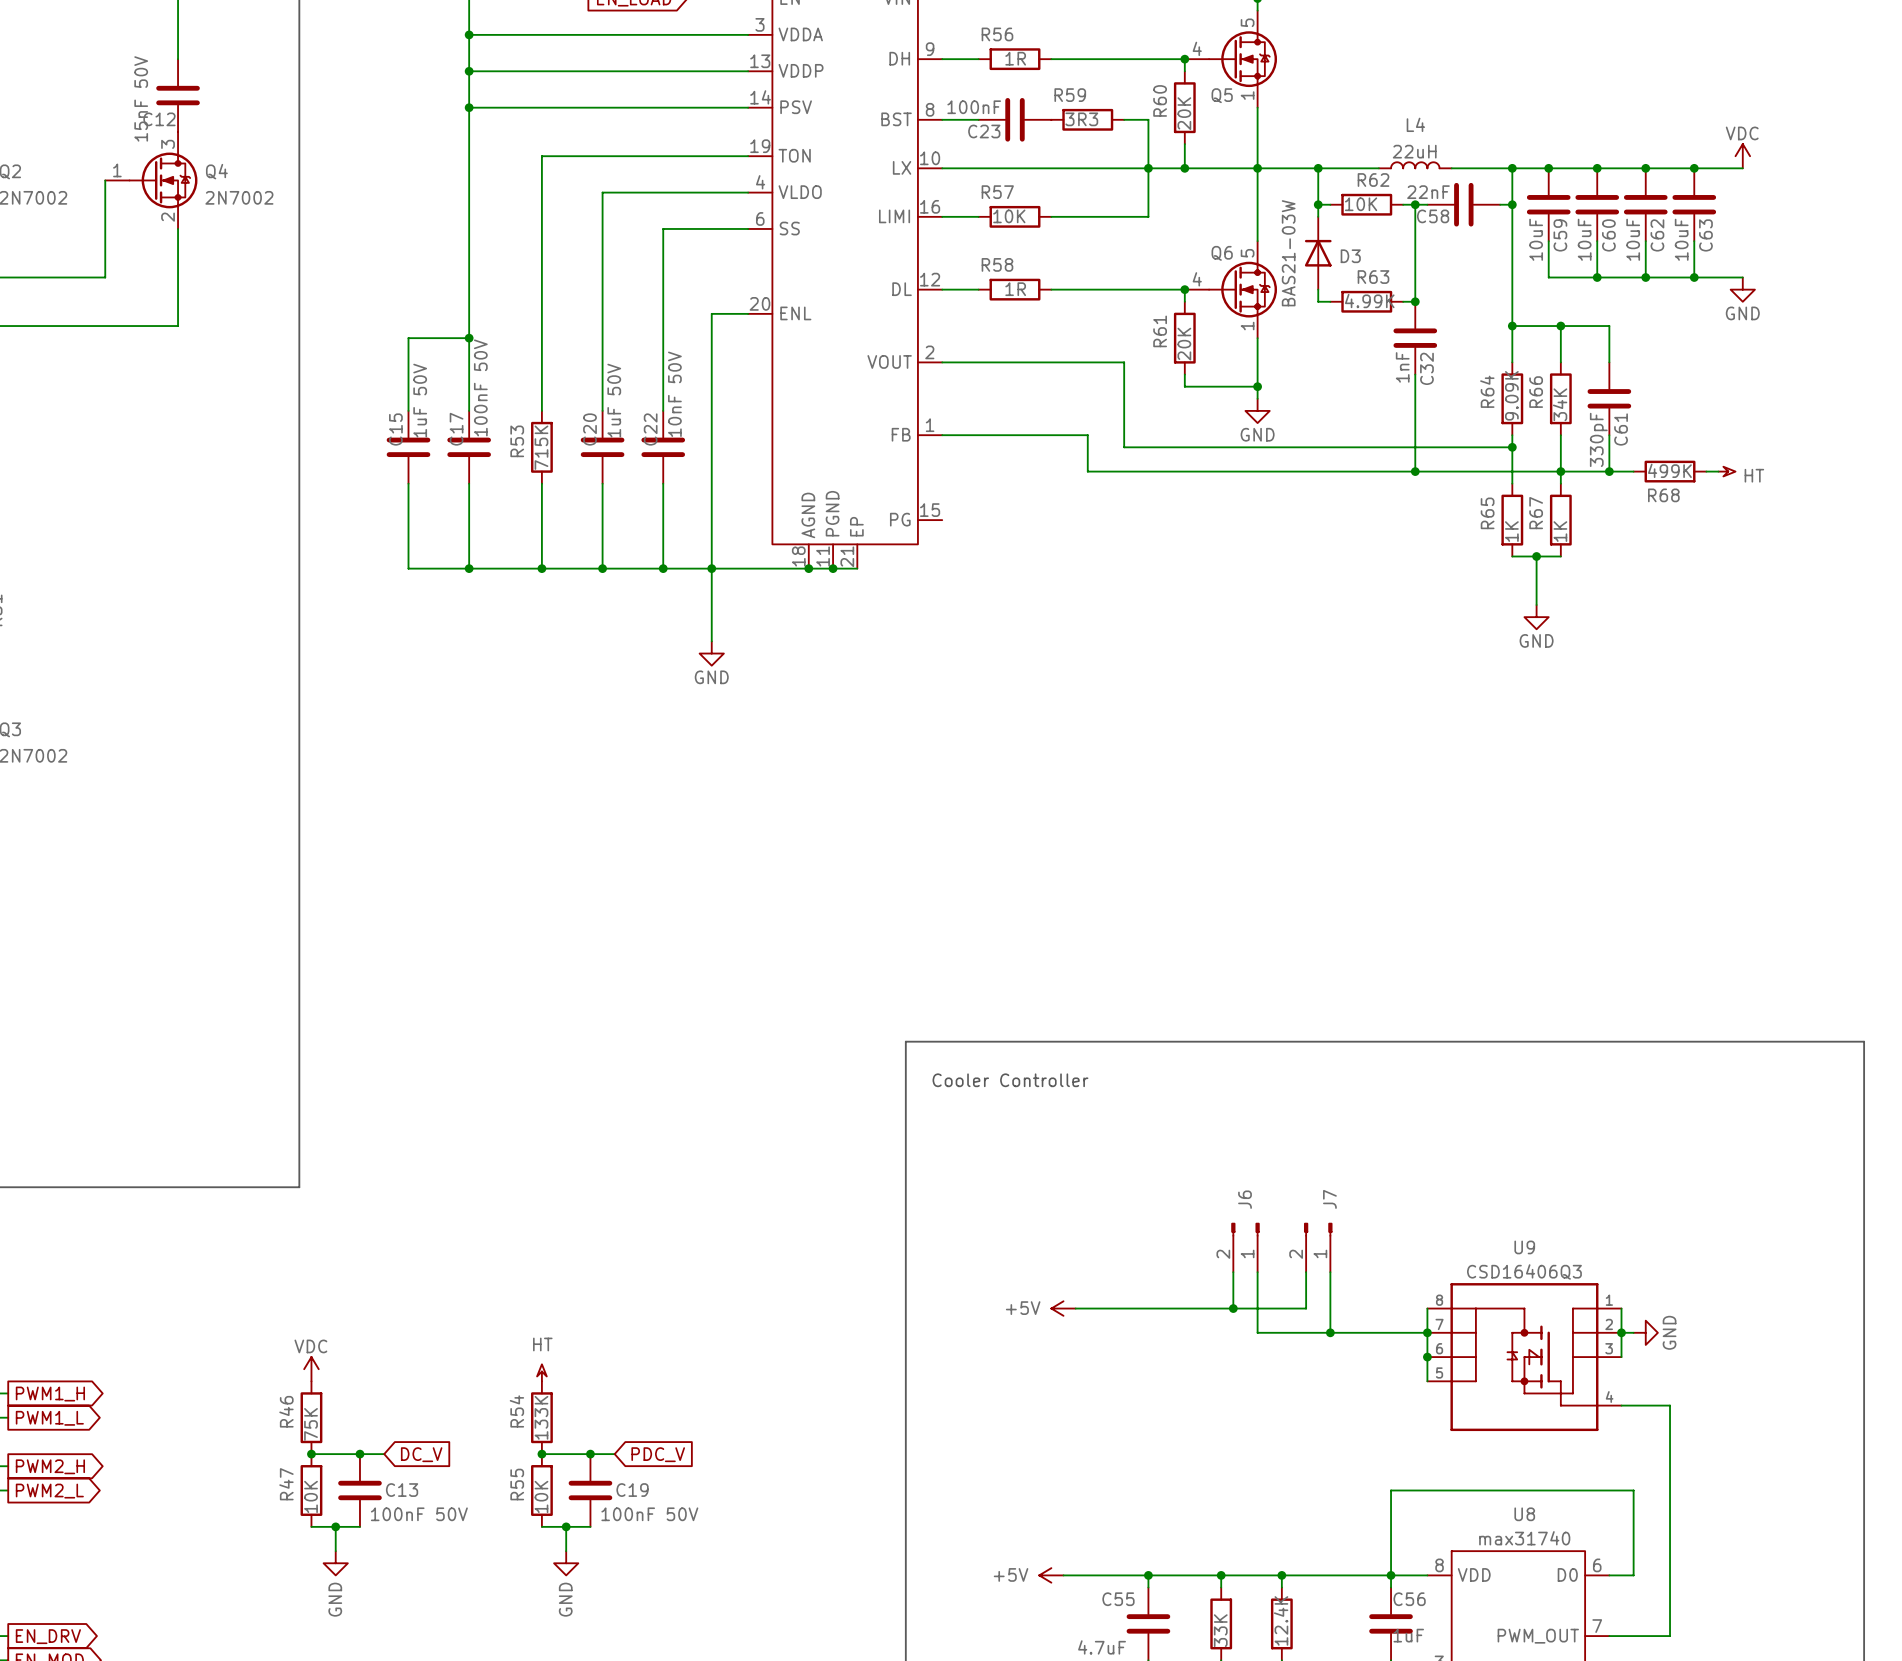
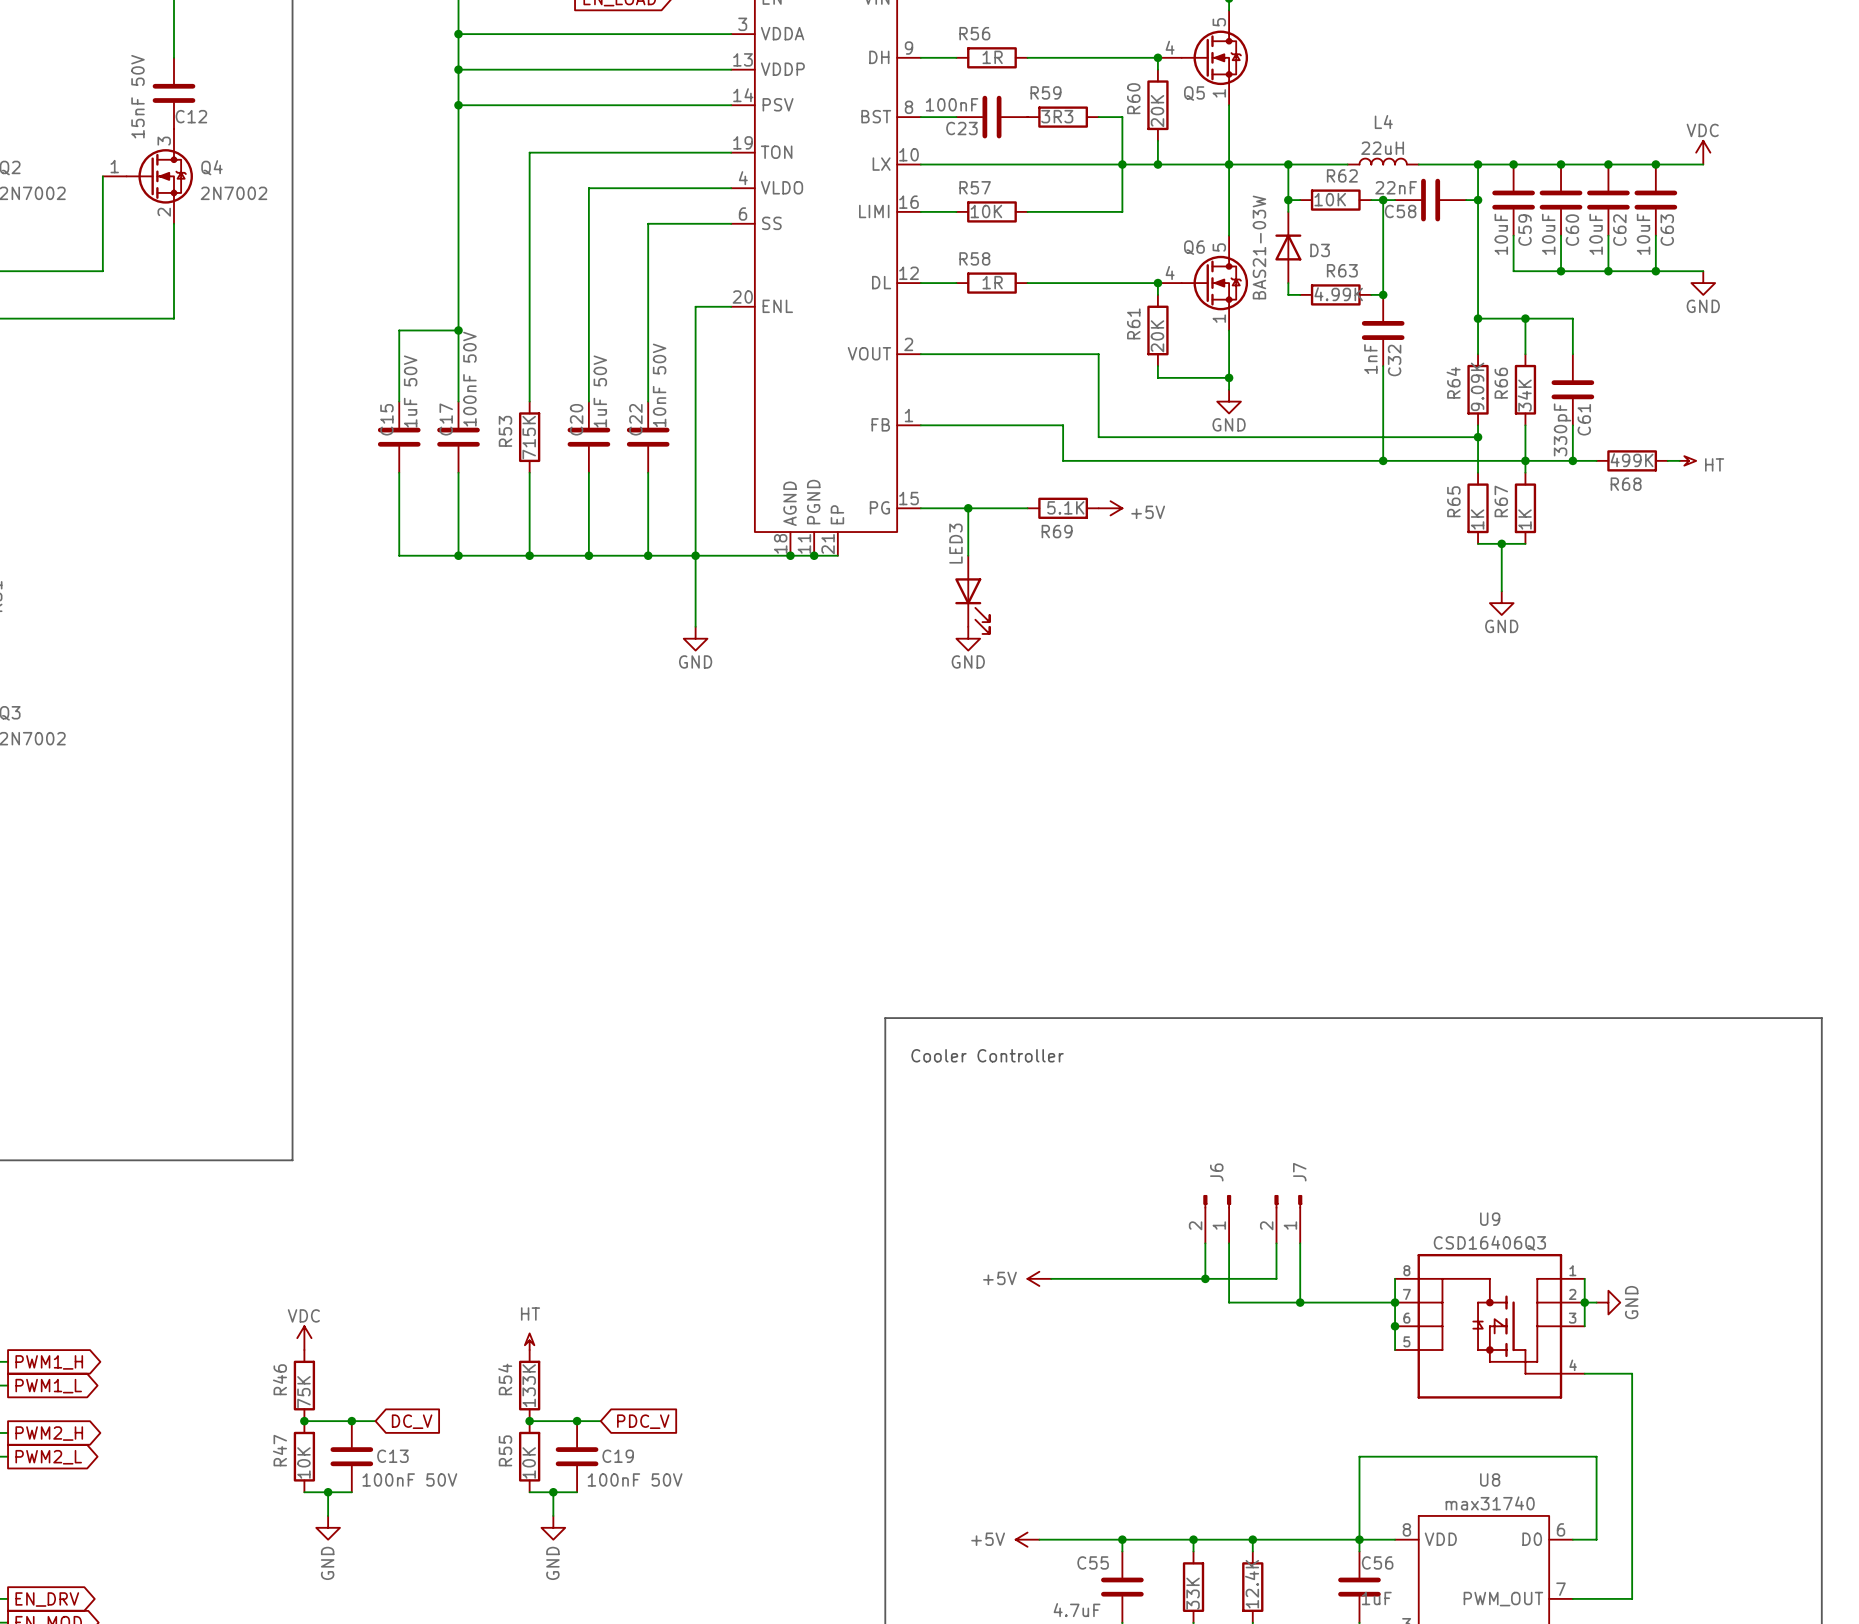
C12 name position: C12 (159, 119) -> C12 (191, 116)
wire: none -> (920, 508) (1027, 508)
wire: none -> (968, 508) (968, 555)
junction: none -> (968, 508)
R69: none -> 5.1K (1063, 508)
power symbol: none -> +5V (1110, 508)
LED3: none -> (972, 594)
power symbol: none -> GND (968, 638)

